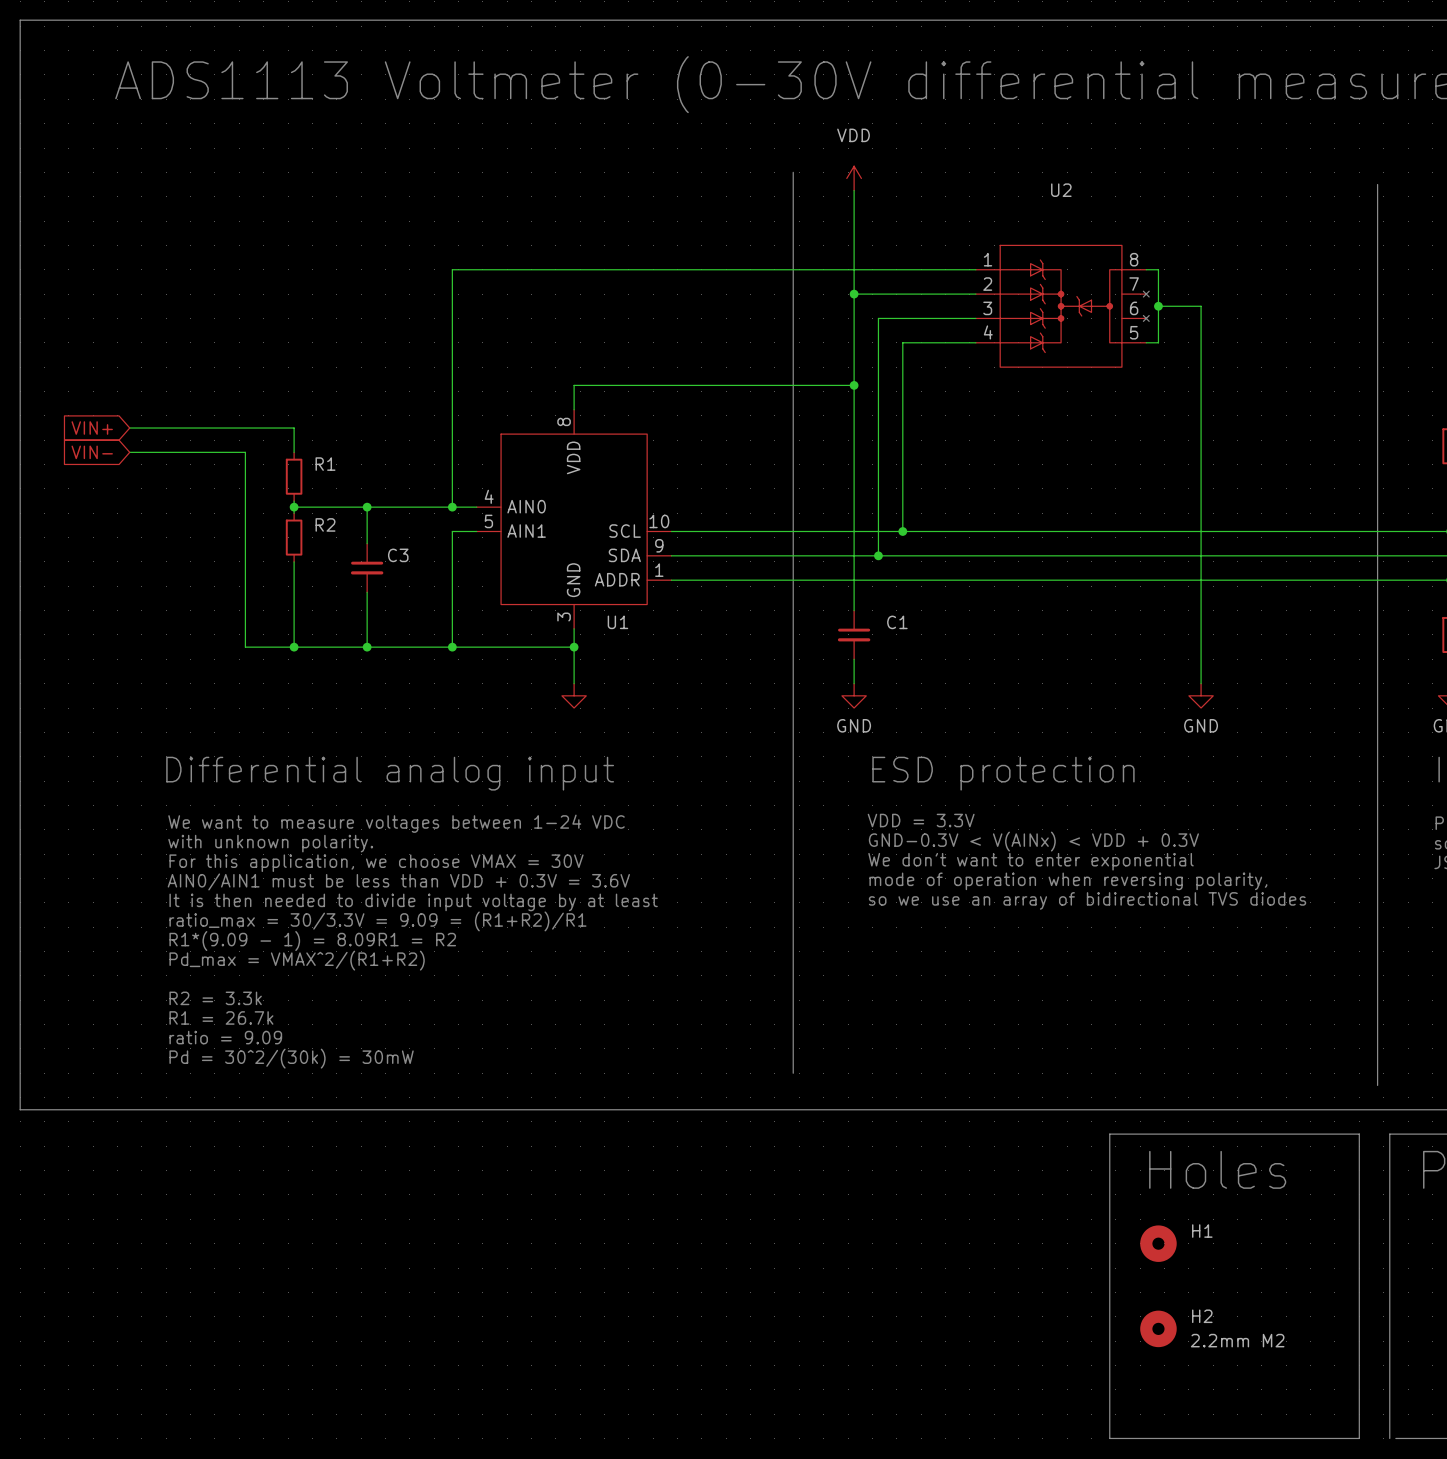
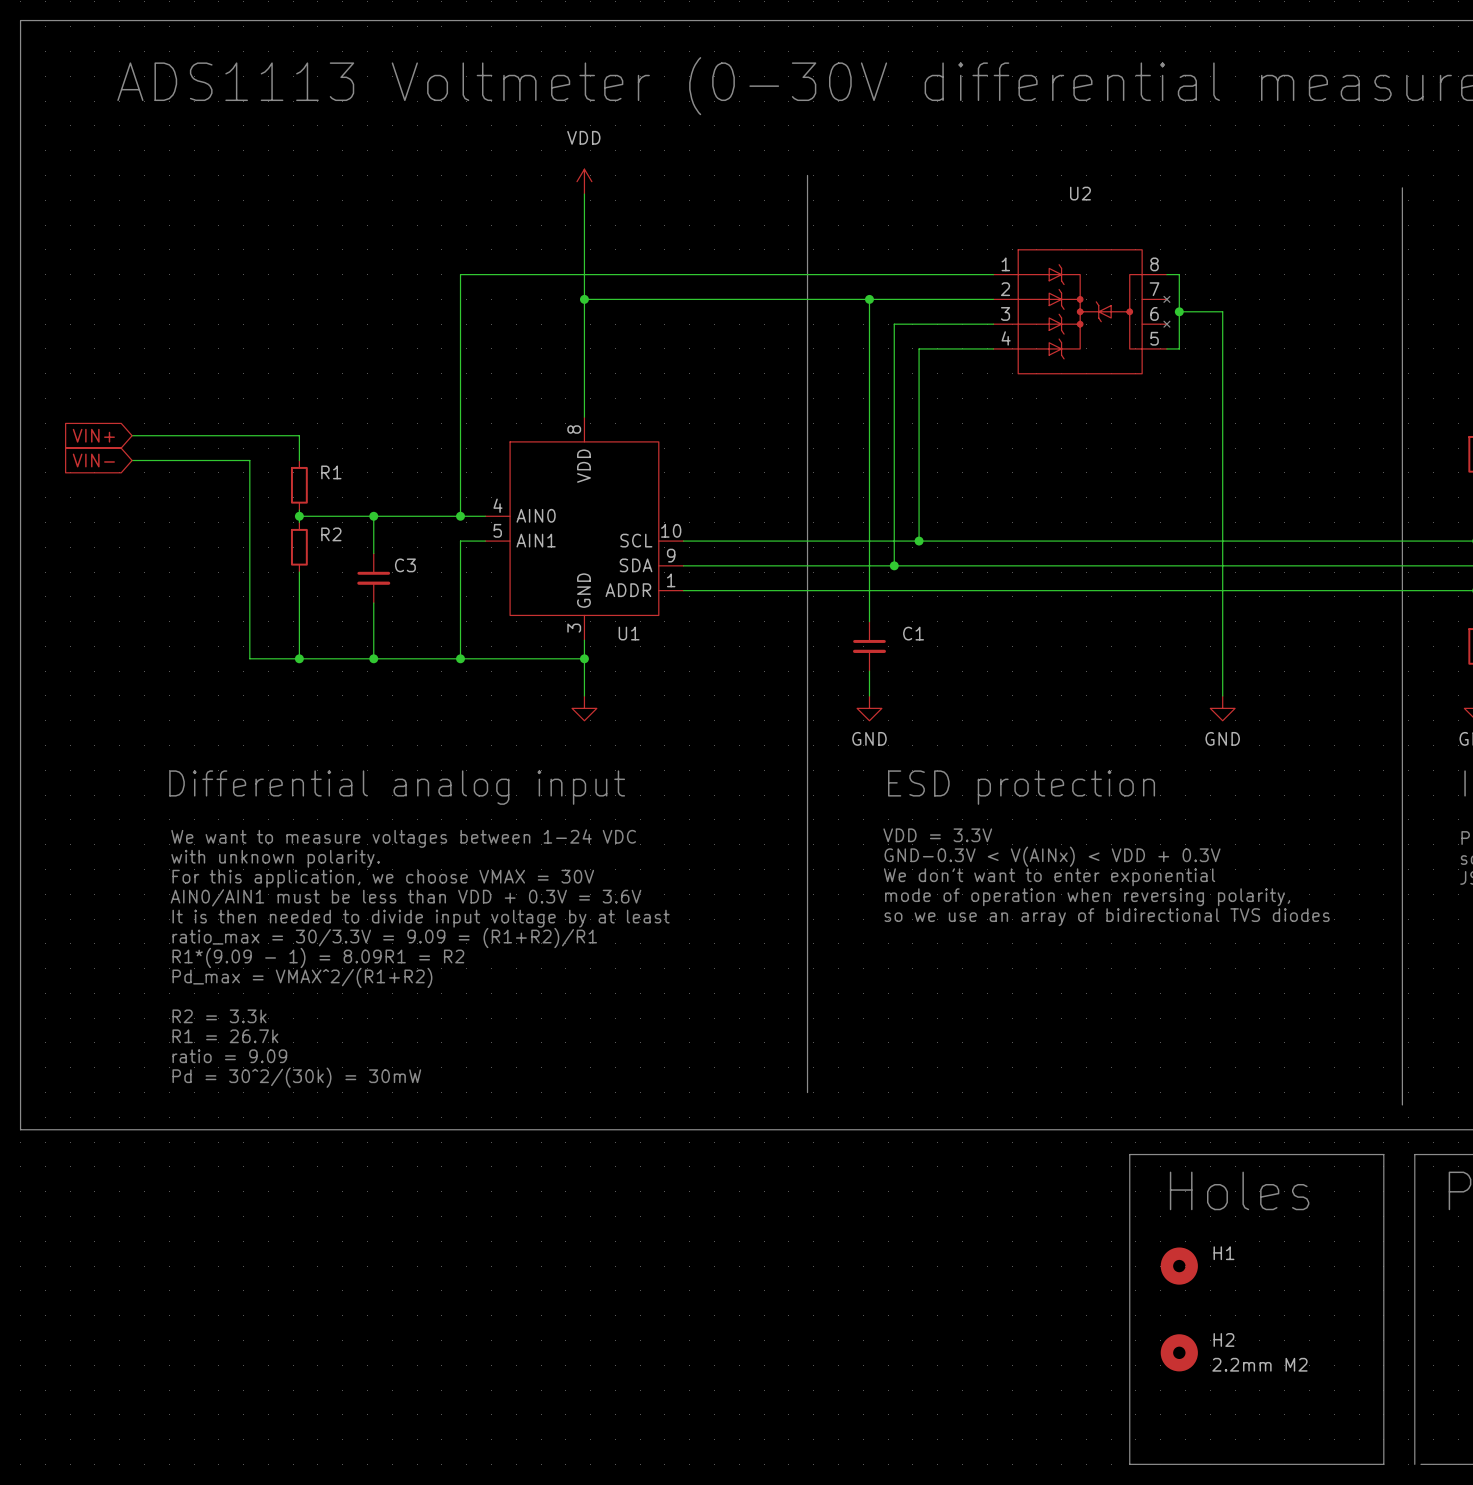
power symbol: none -> VDD (584, 181)
power symbol: VDD (854, 178) -> none
wire: (854, 190) (854, 294) -> (584, 299) (869, 299)
junction: none -> (584, 299)
wire: (574, 385) (854, 385) -> (584, 392) (584, 194)
junction: (854, 385) -> none

